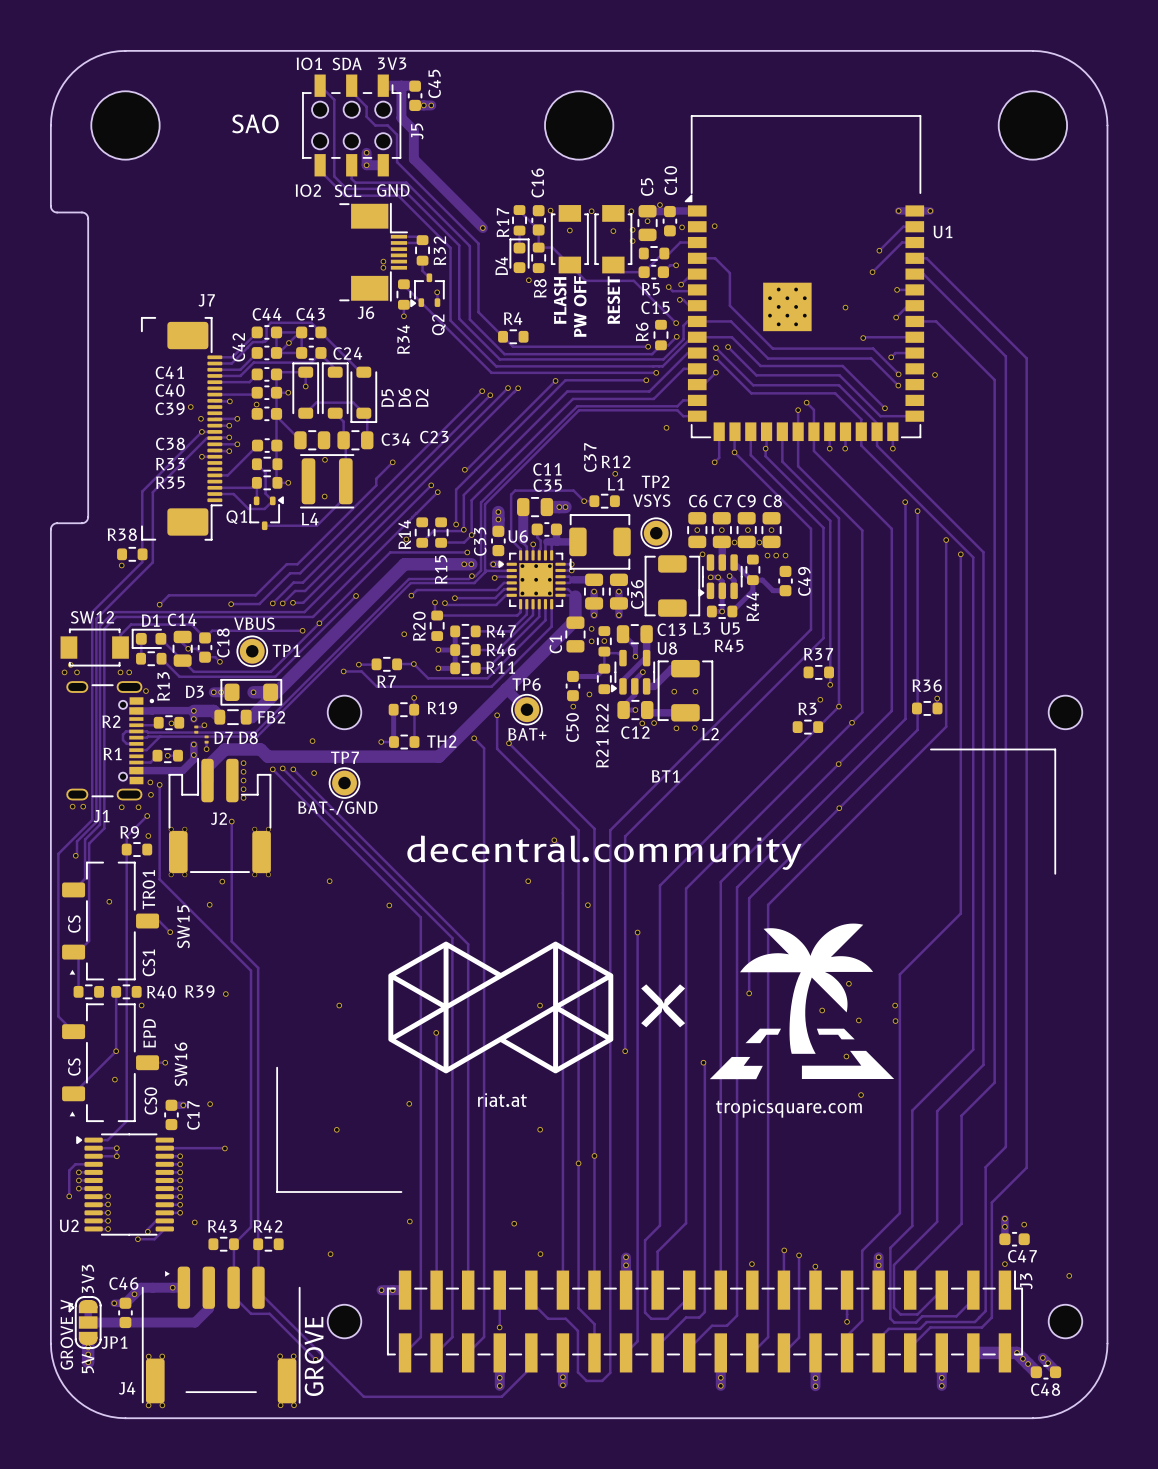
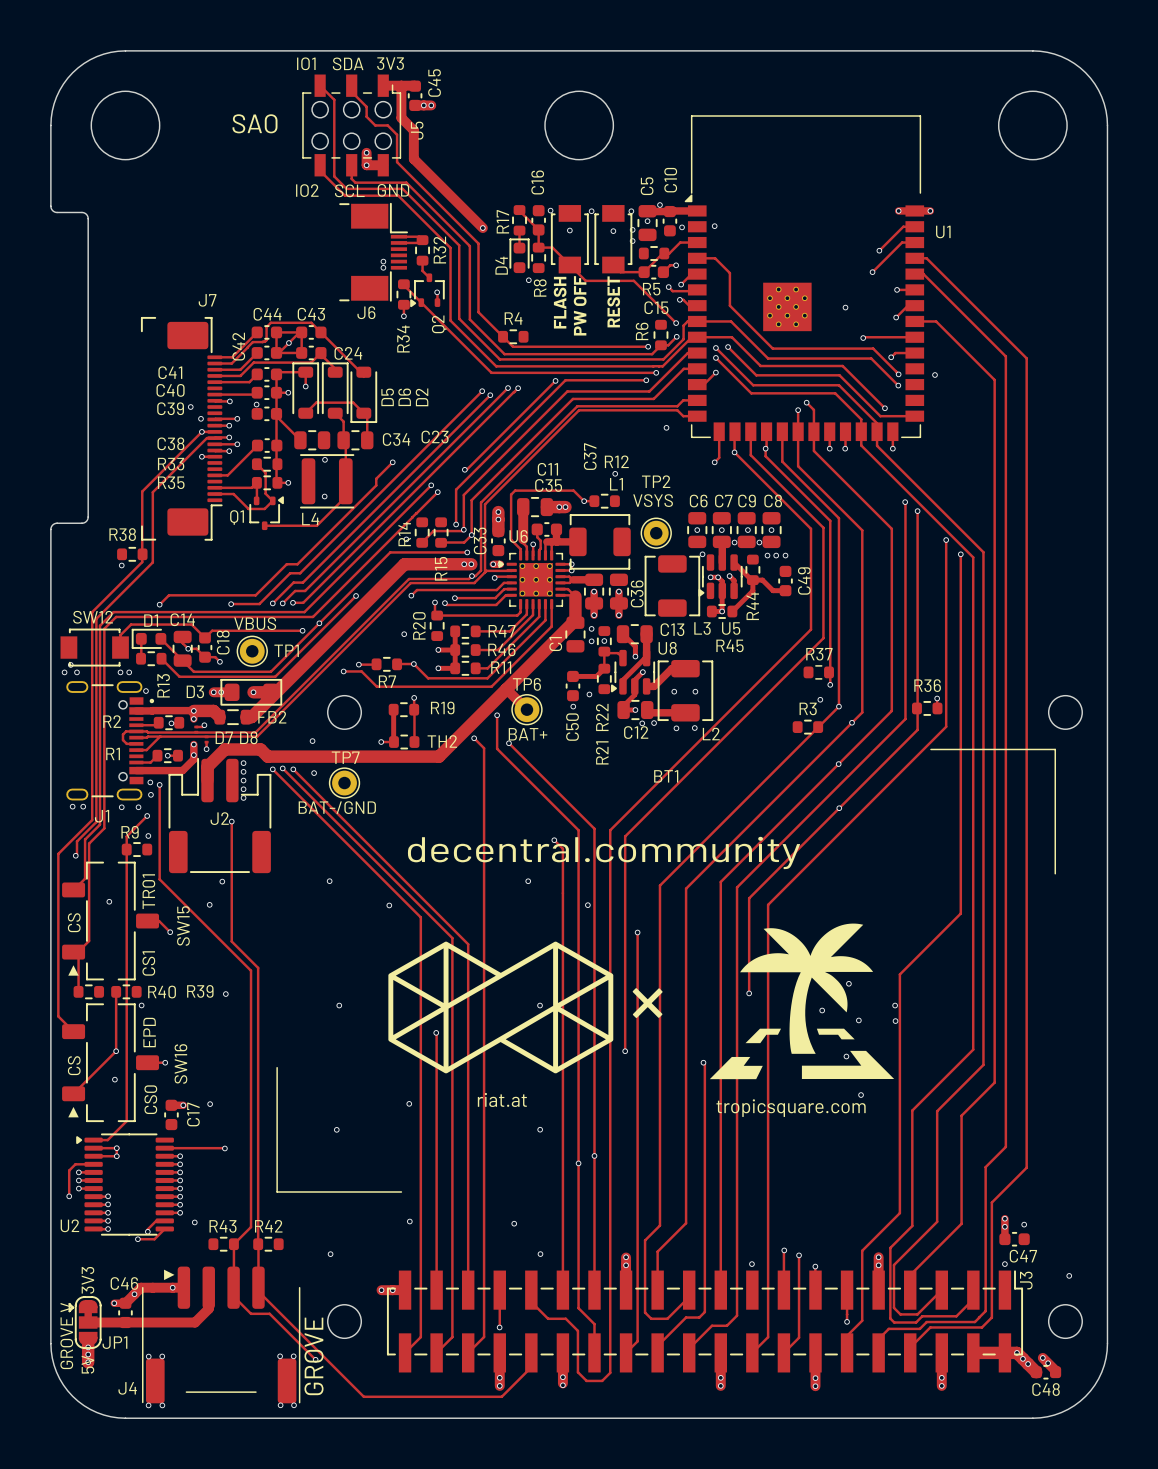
via: (171, 829) -> none
via: (184, 829) -> none
via: (254, 829) -> none
via: (268, 829) -> none
via: (171, 874) -> none
via: (184, 874) -> none
via: (254, 874) -> none
via: (268, 874) -> none

